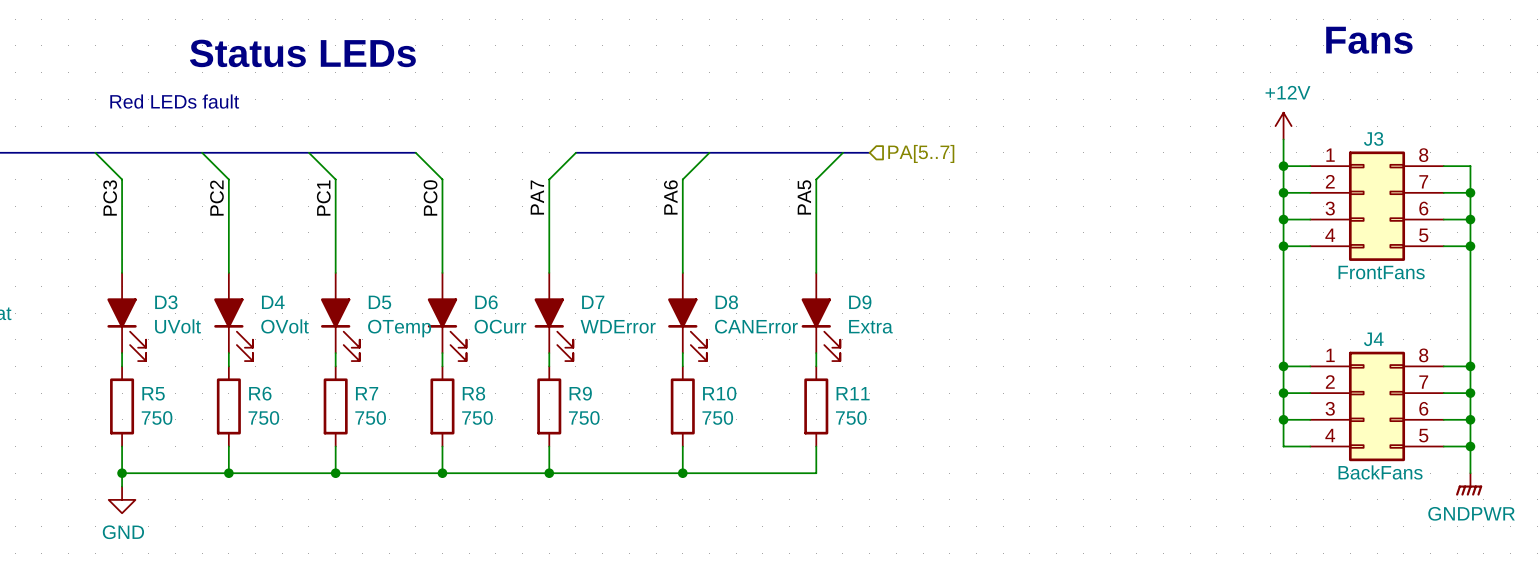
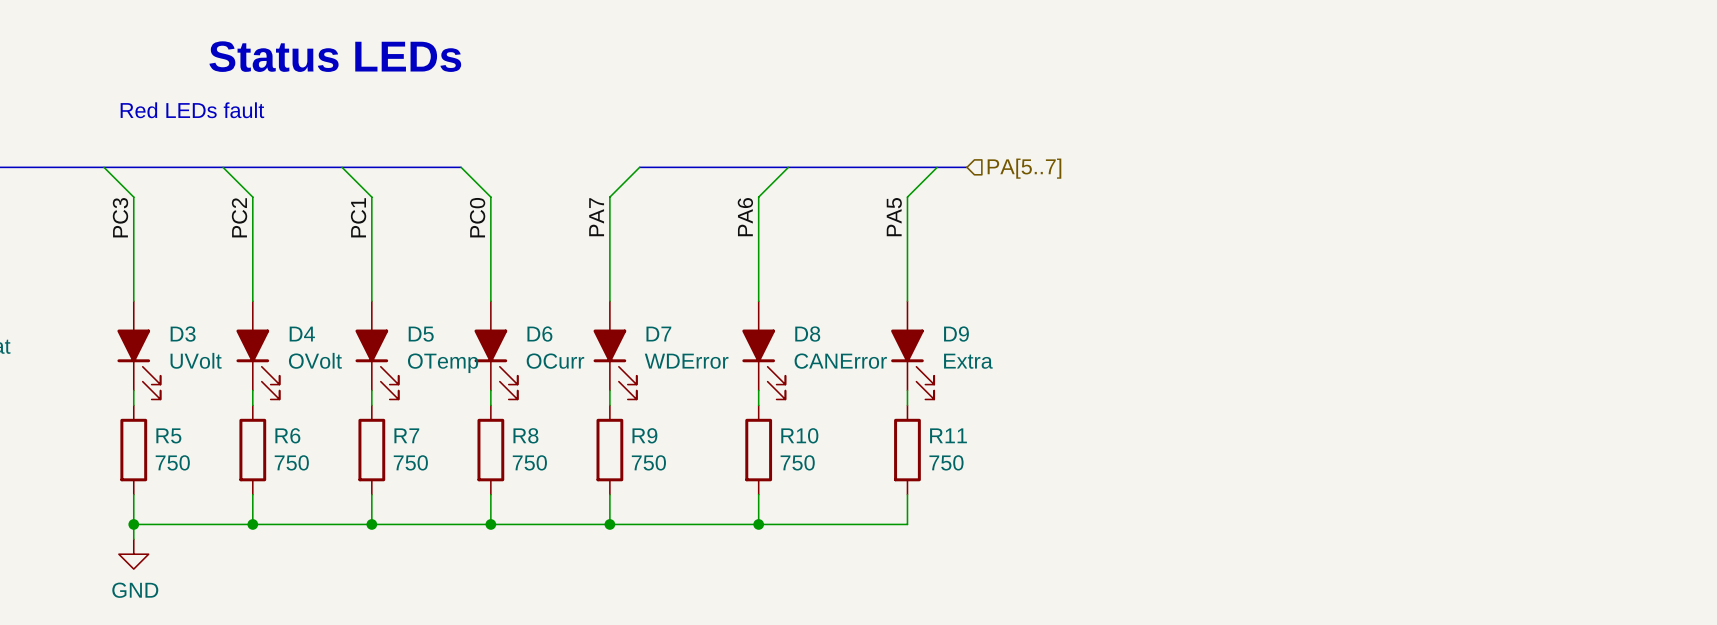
text: Fans (1369, 40) -> none
power symbol: +12V (1283, 126) -> none
wire: (1283, 139) (1283, 446) (1310, 446) -> none
wire: (1283, 166) (1310, 166) -> none
junction: (1283, 166) -> none
wire: (1443, 166) (1470, 166) (1470, 473) -> none
wire: (1283, 192) (1310, 192) -> none
junction: (1283, 192) -> none
wire: (1443, 192) (1470, 192) -> none
junction: (1470, 192) -> none
J3: FrontFans (1377, 206) -> none
wire: (1283, 219) (1310, 219) -> none
junction: (1283, 219) -> none
wire: (1443, 219) (1470, 219) -> none
junction: (1470, 219) -> none
wire: (1283, 246) (1310, 246) -> none
junction: (1283, 246) -> none
wire: (1443, 246) (1470, 246) -> none
junction: (1470, 246) -> none
wire: (1283, 366) (1310, 366) -> none
junction: (1283, 366) -> none
wire: (1443, 366) (1470, 366) -> none
junction: (1470, 366) -> none
wire: (1283, 393) (1310, 393) -> none
junction: (1283, 393) -> none
wire: (1443, 393) (1470, 393) -> none
junction: (1470, 393) -> none
J4: BackFans (1377, 406) -> none
wire: (1283, 419) (1310, 419) -> none
junction: (1283, 419) -> none
wire: (1443, 419) (1470, 419) -> none
junction: (1470, 419) -> none
wire: (1443, 446) (1470, 446) -> none
junction: (1470, 446) -> none
power symbol: GNDPWR (1469, 484) -> none

